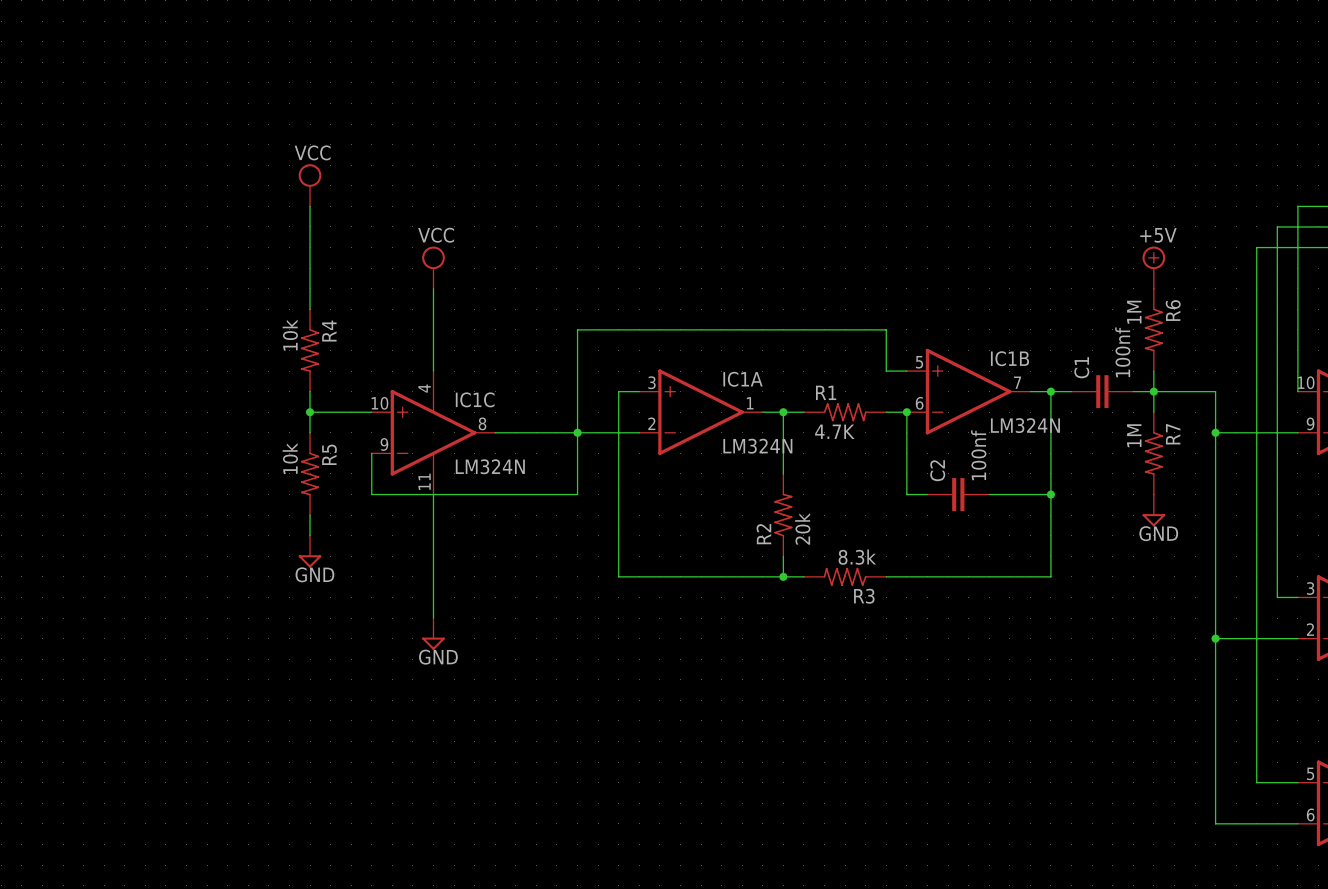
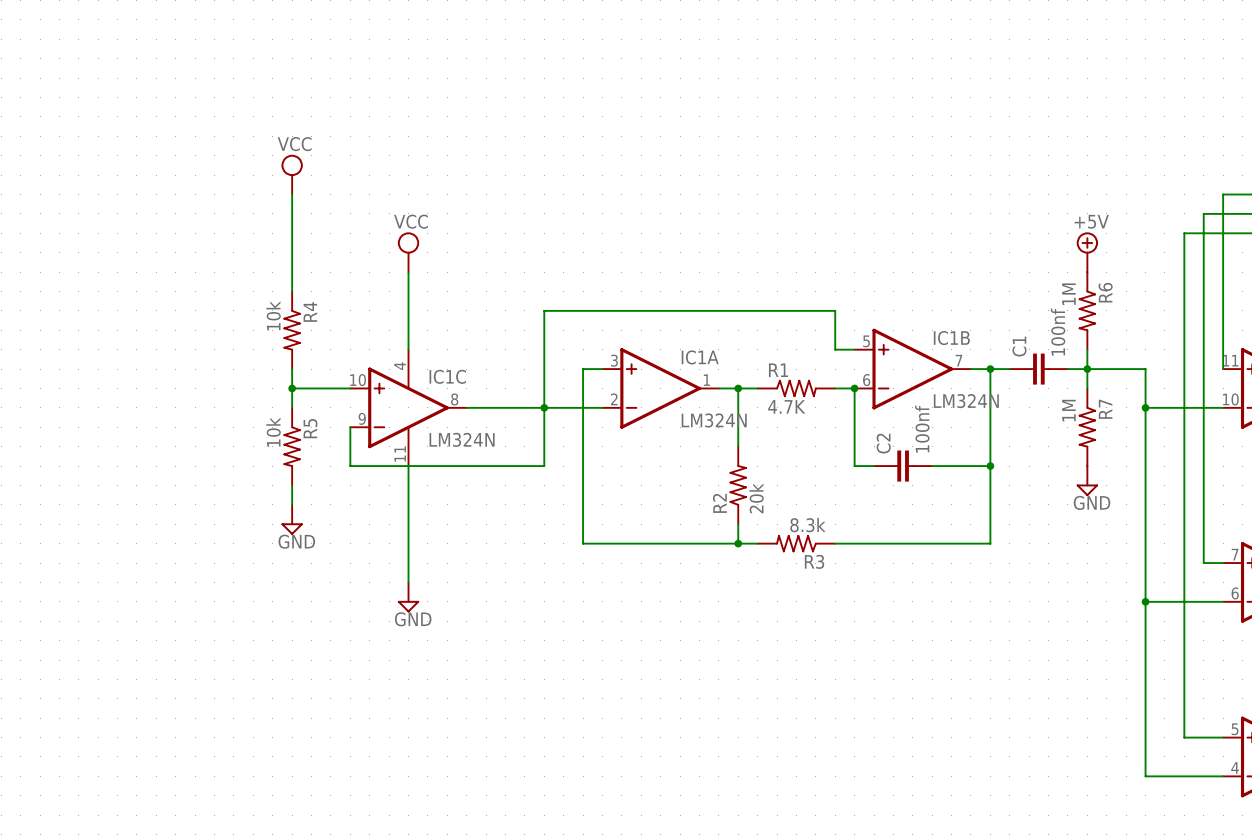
part pin number: 10 (1306, 382) -> 11 (1230, 360)
part pin number: 9 (1310, 423) -> 10 (1230, 399)
part pin number: 3 (1310, 588) -> 7 (1235, 554)
part pin number: 2 (1310, 629) -> 6 (1235, 593)
part pin number: 6 (1310, 814) -> 4 (1235, 767)

